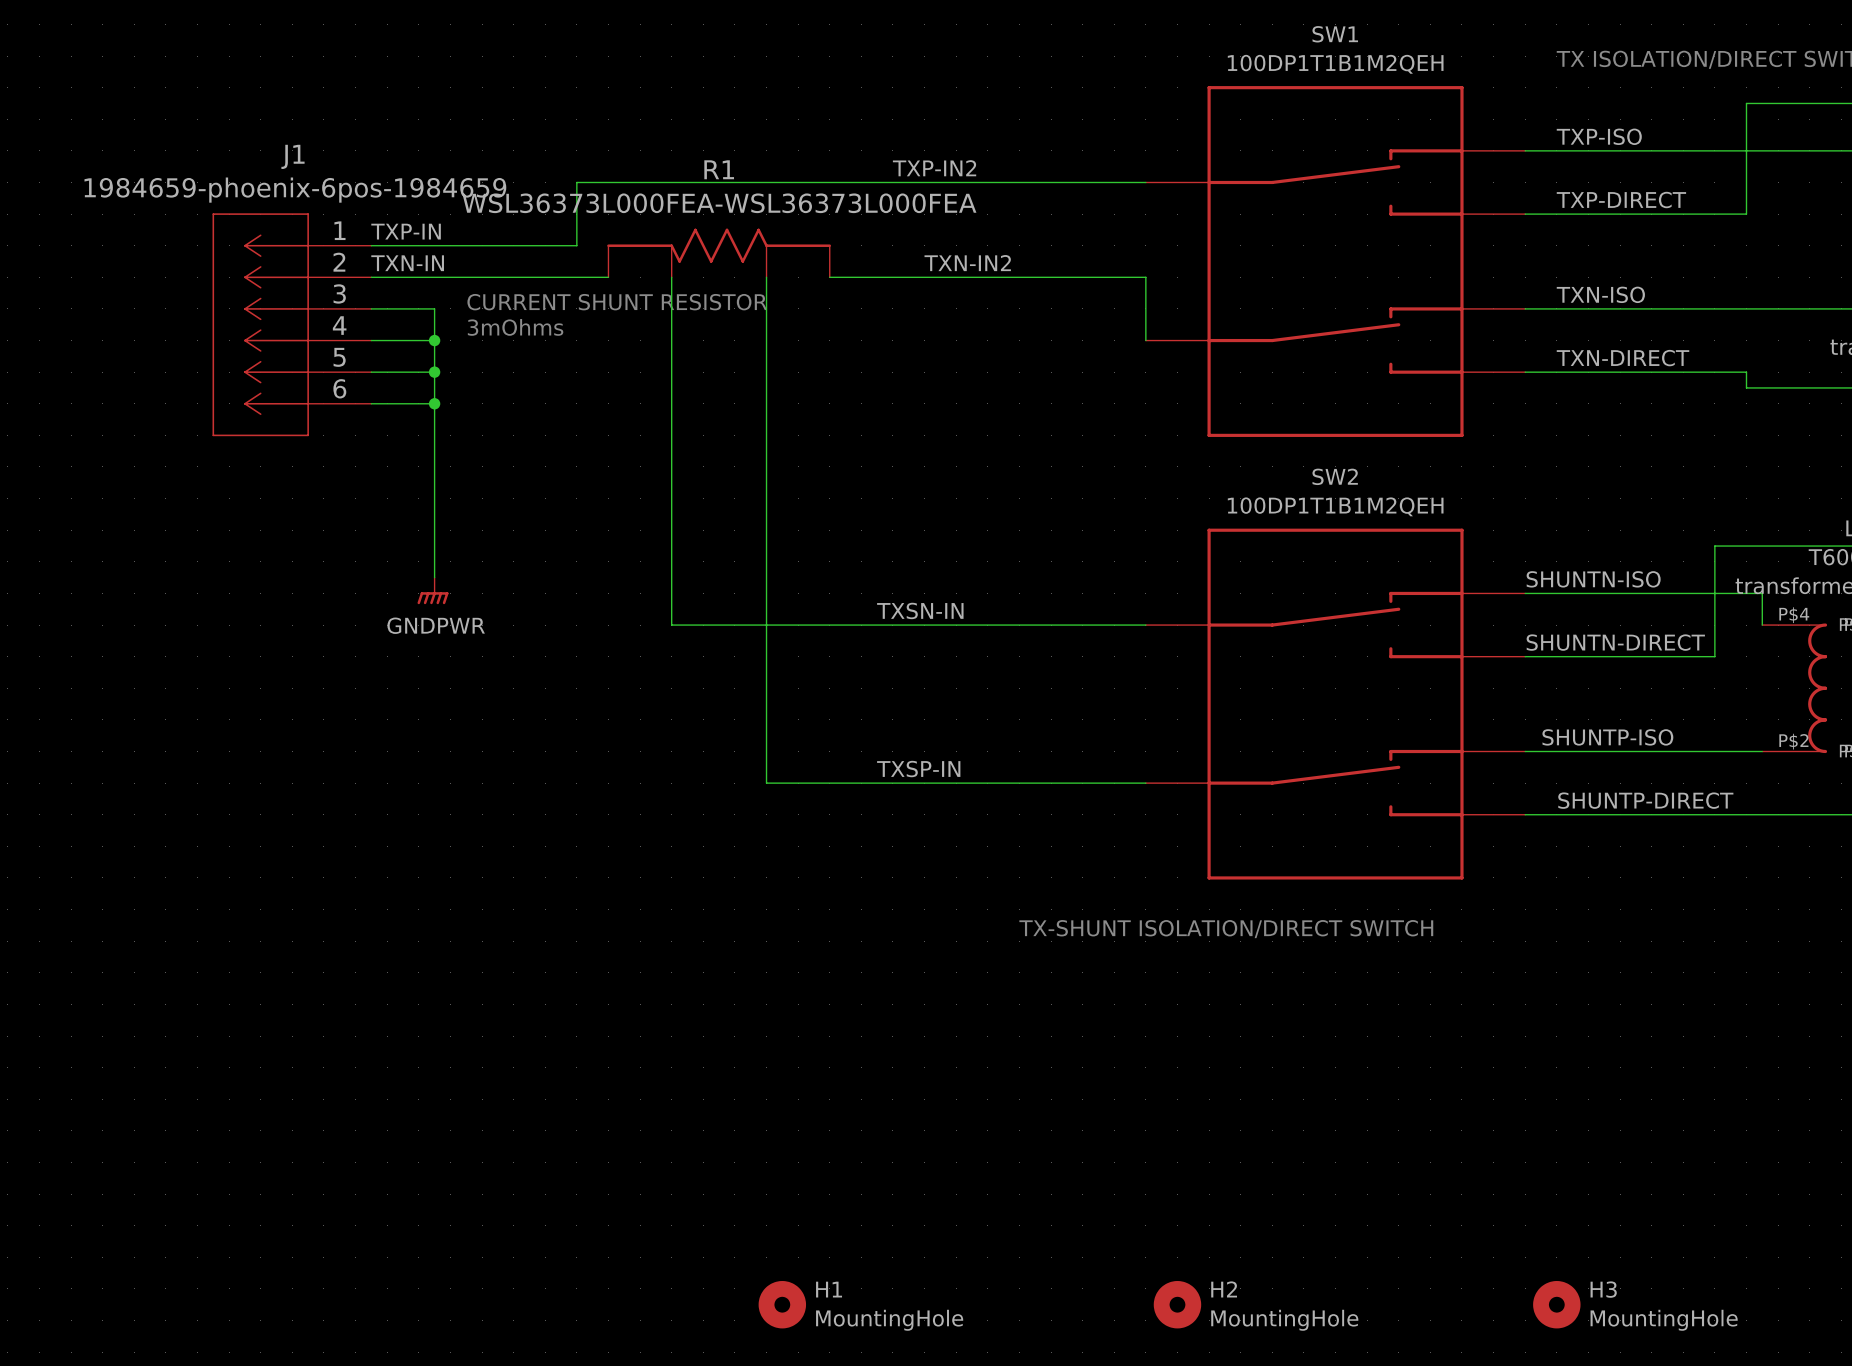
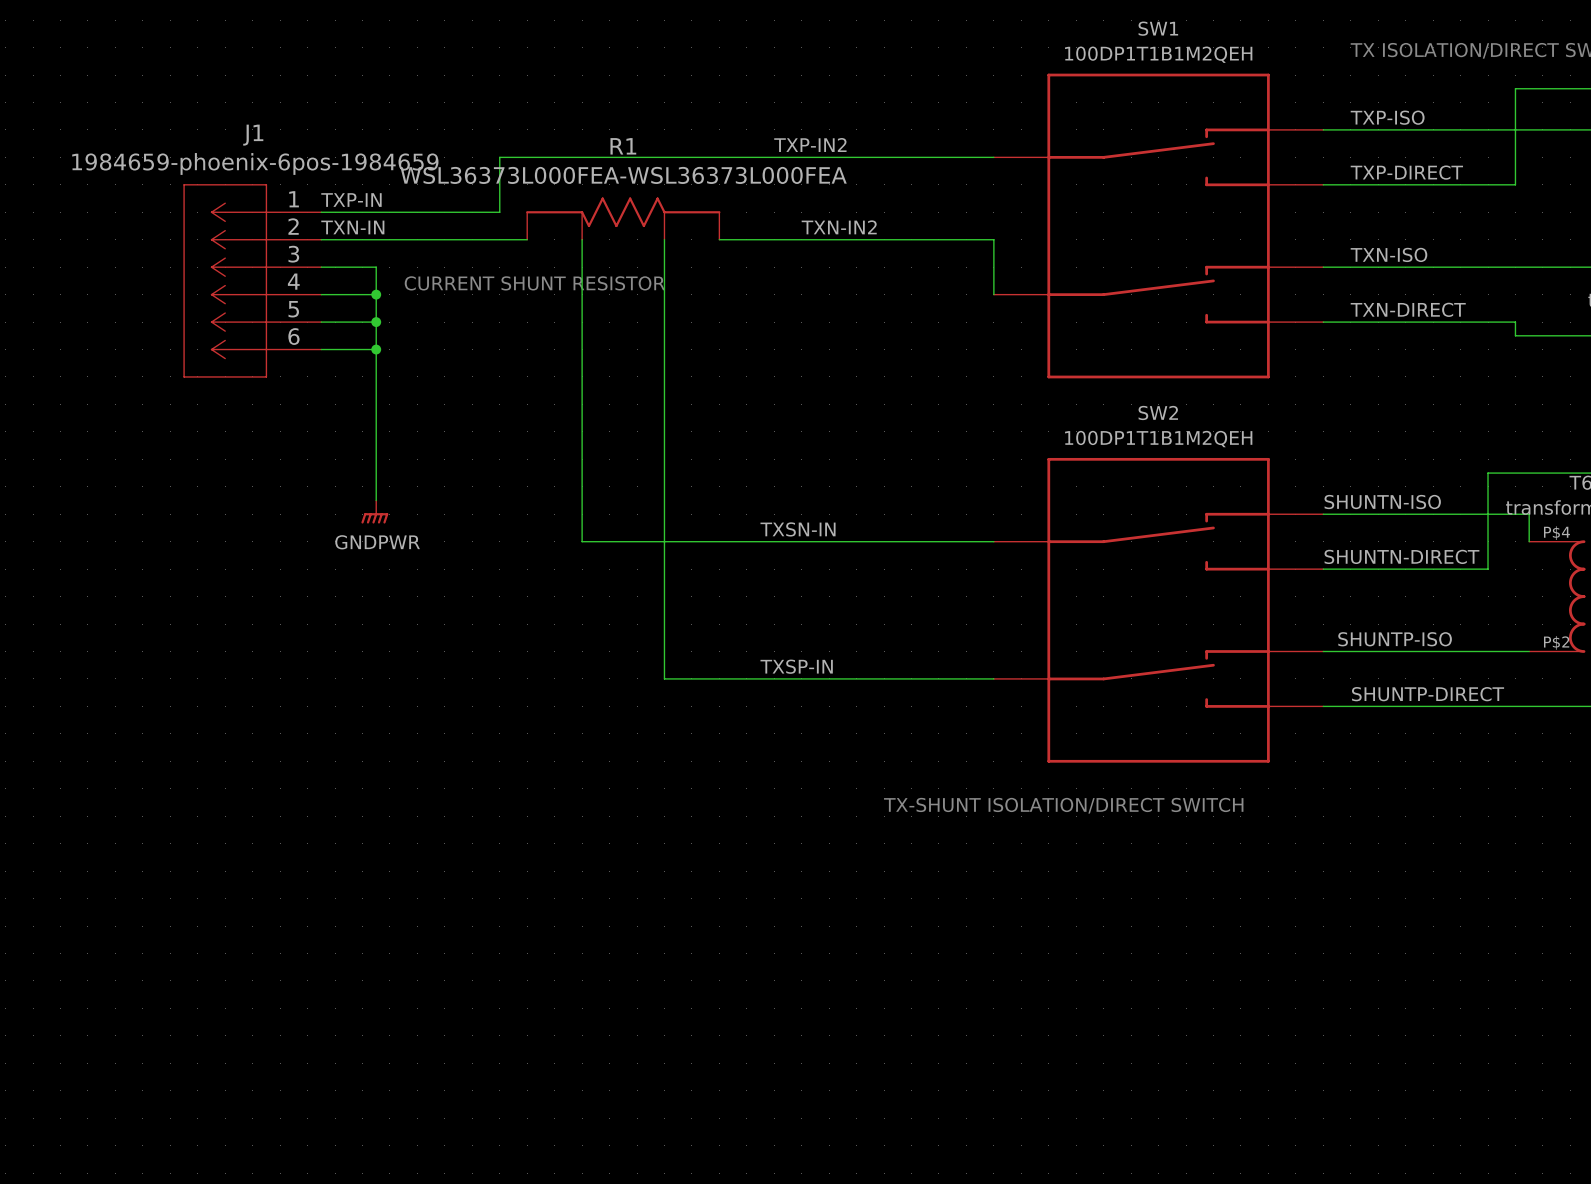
text: CURRENT SHUNT RESISTOR (617, 302) -> none
text: 3mOhms (515, 327) -> CURRENT SHUNT RESISTOR (534, 283)
H1: MountingHole (782, 1304) -> none
H2: MountingHole (1177, 1304) -> none
H3: MountingHole (1556, 1304) -> none

